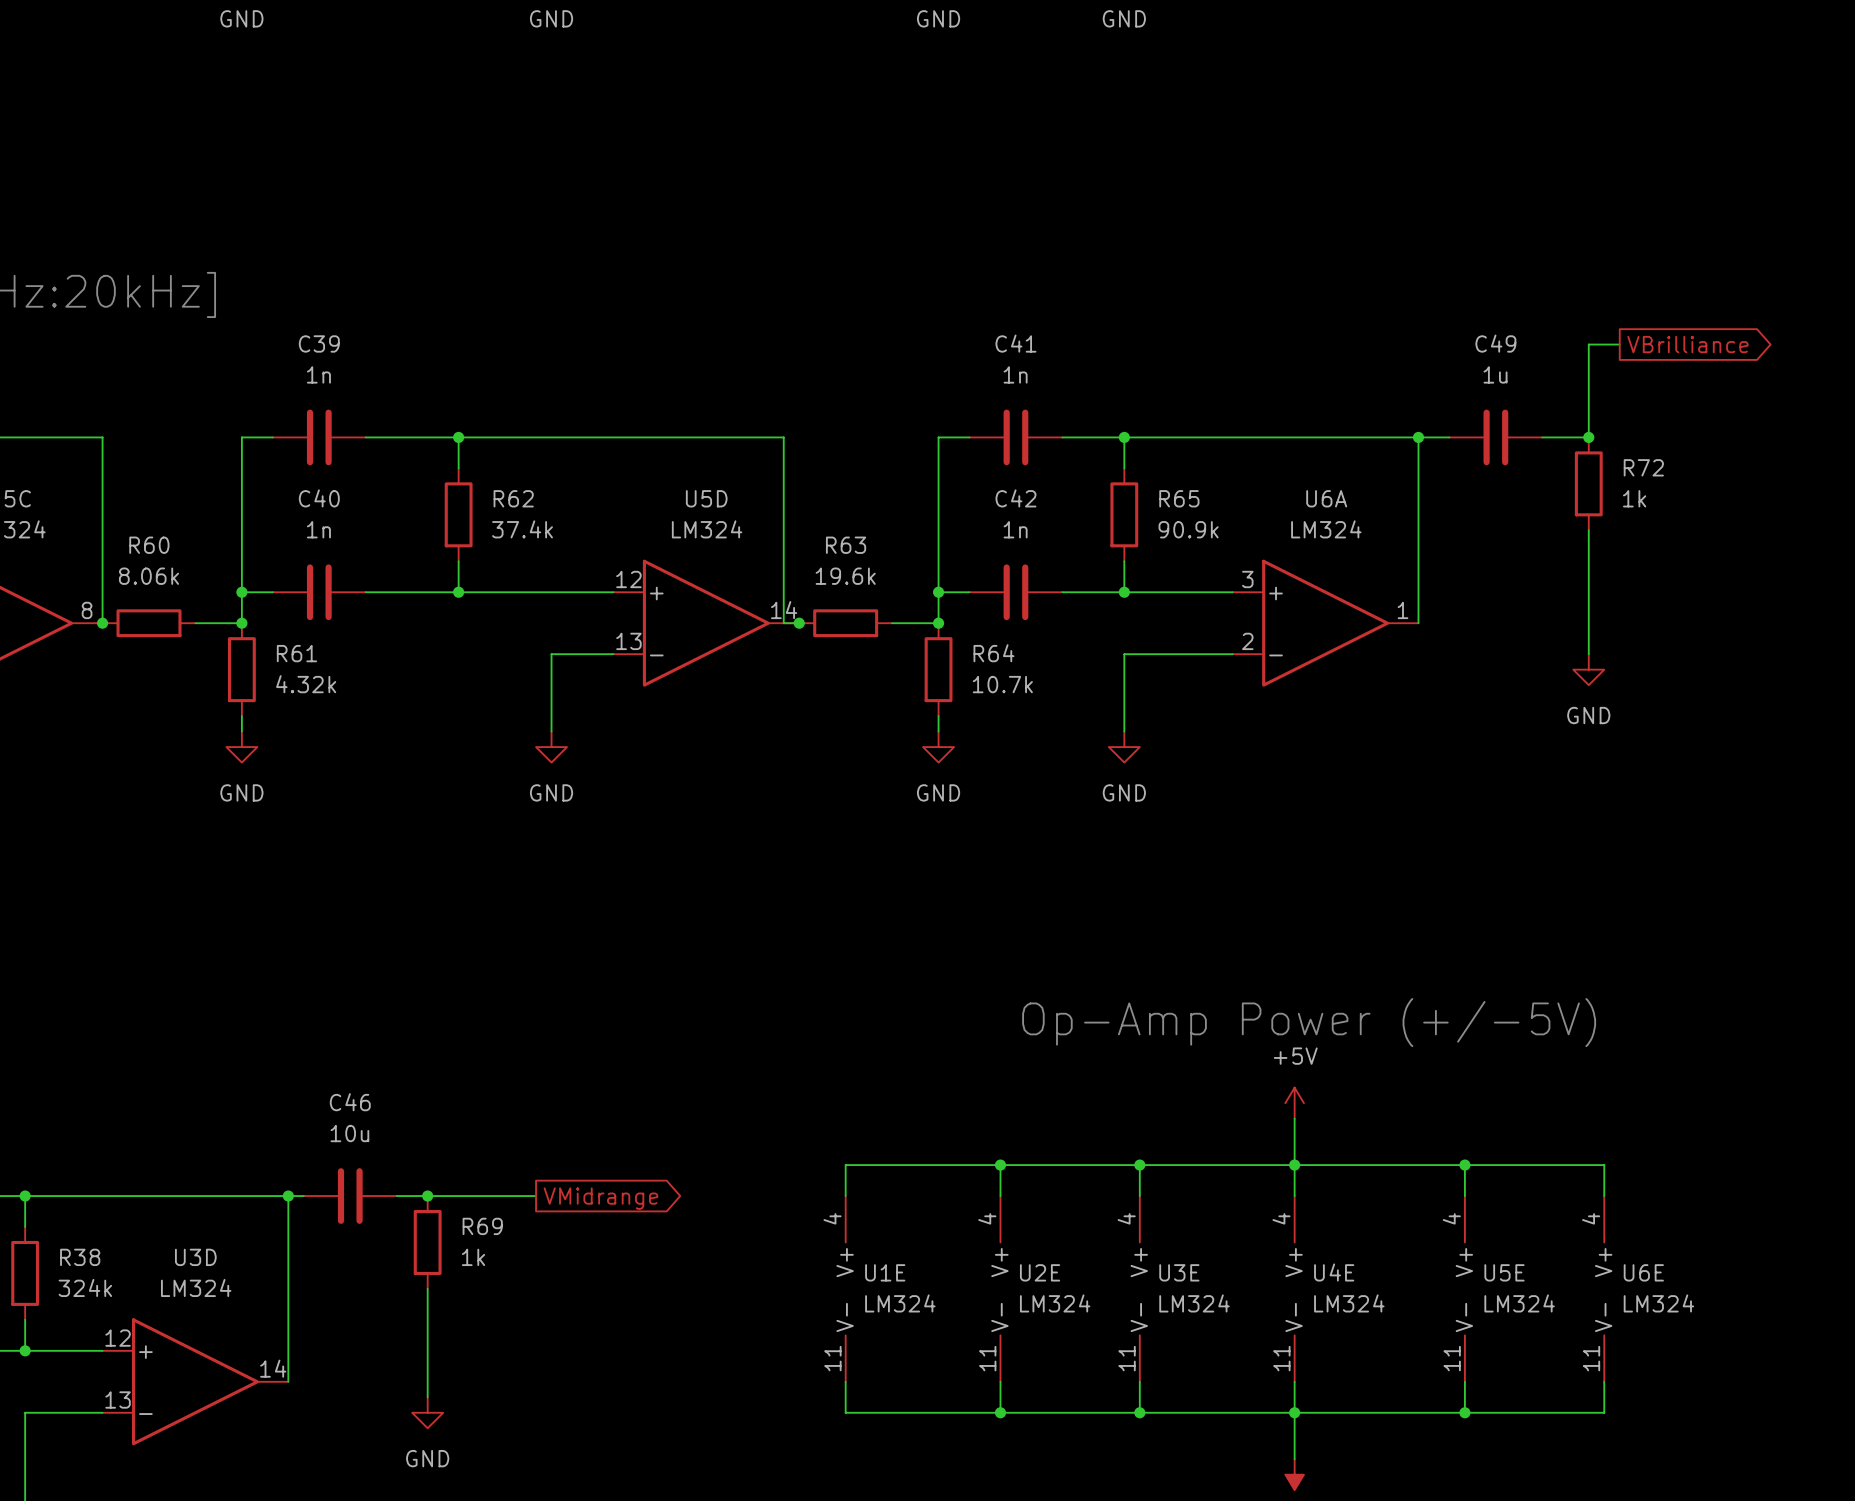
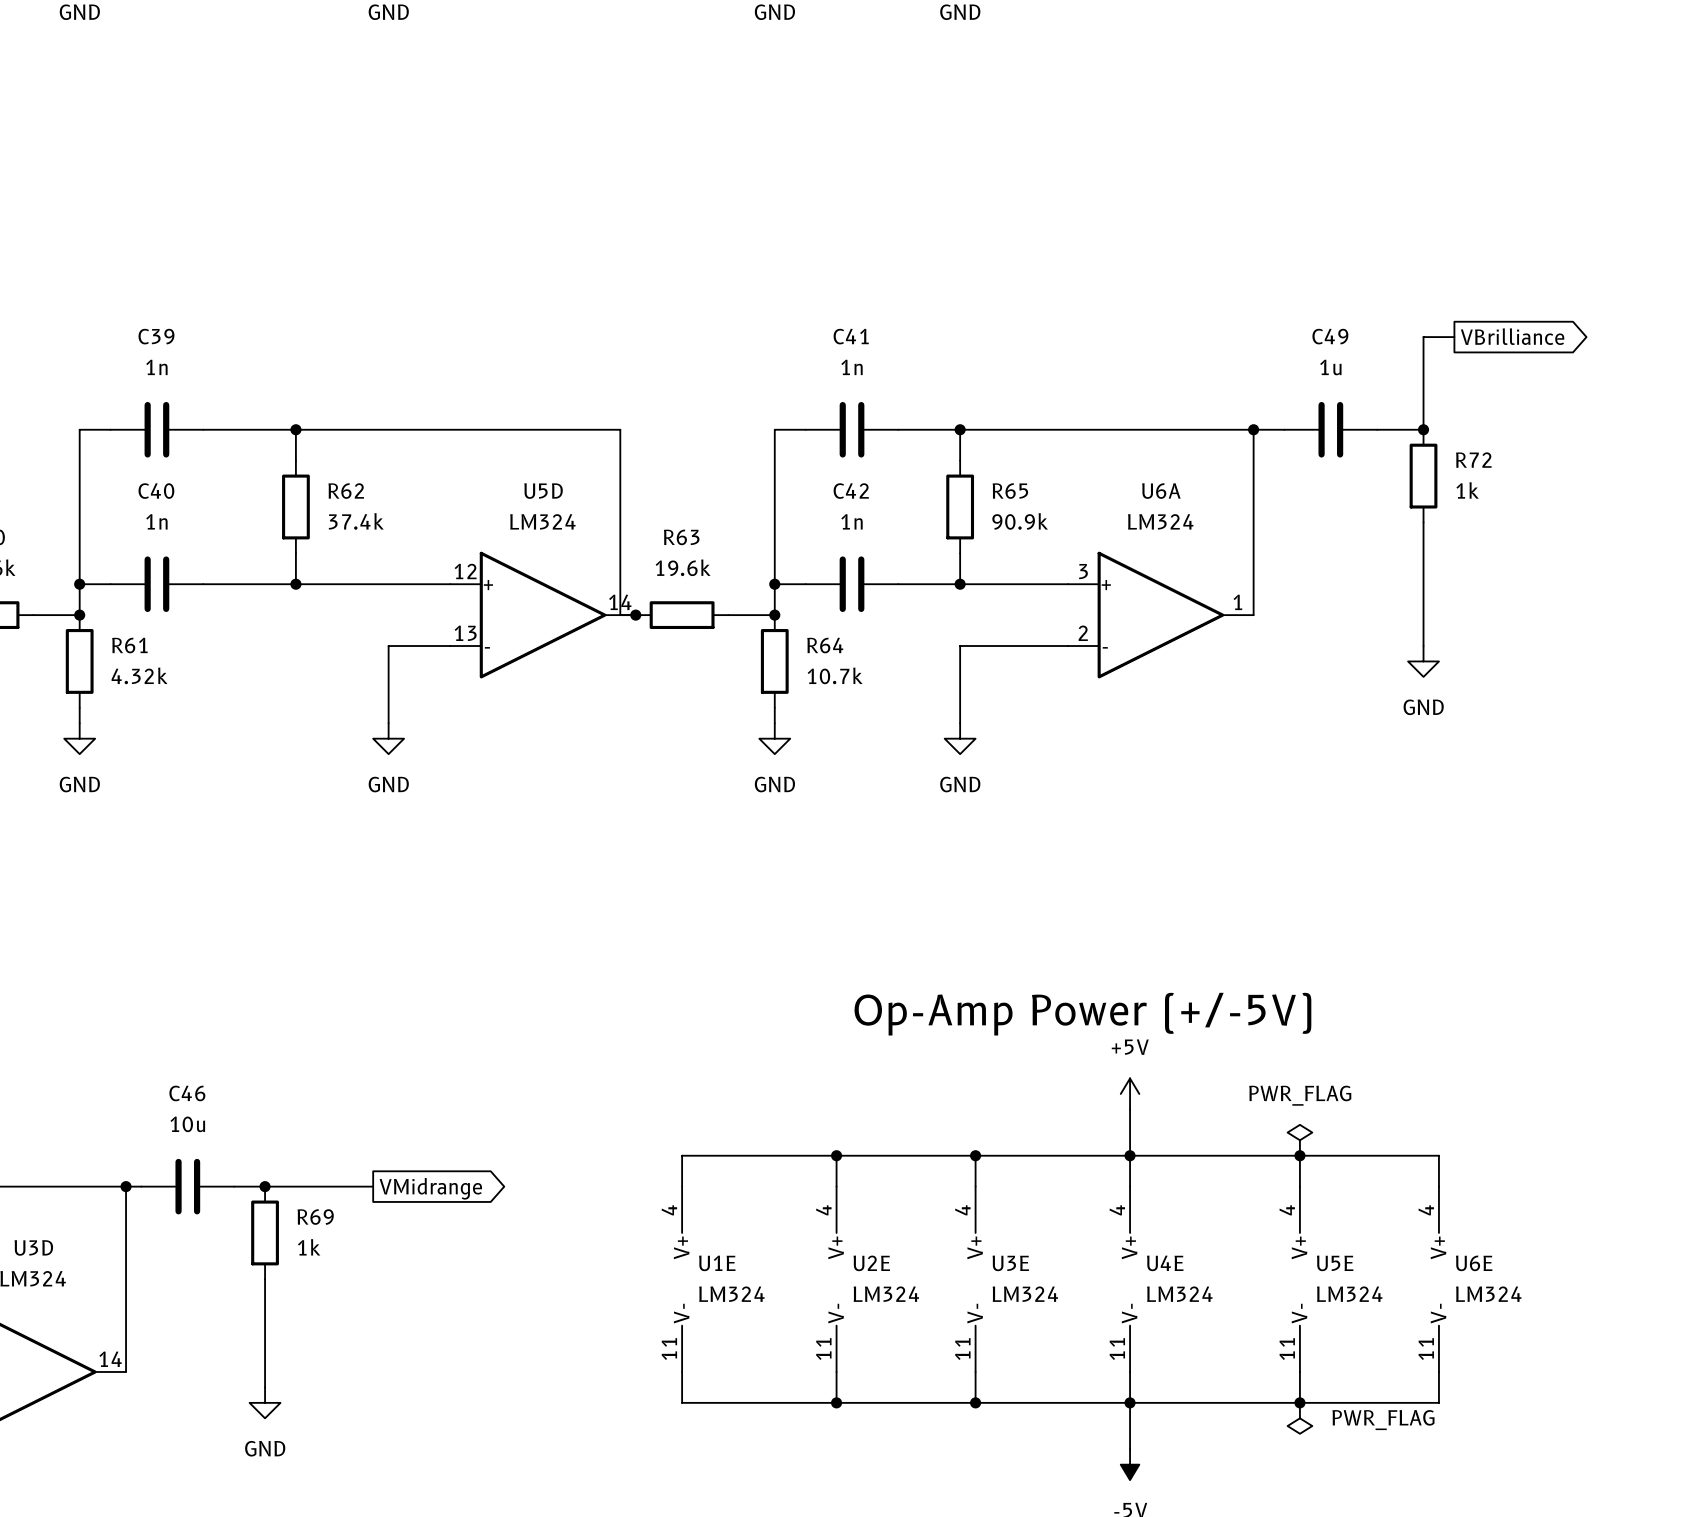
power symbol: none -> PWR_FLAG (1299, 1140)
power symbol: none -> PWR_FLAG (1299, 1418)

